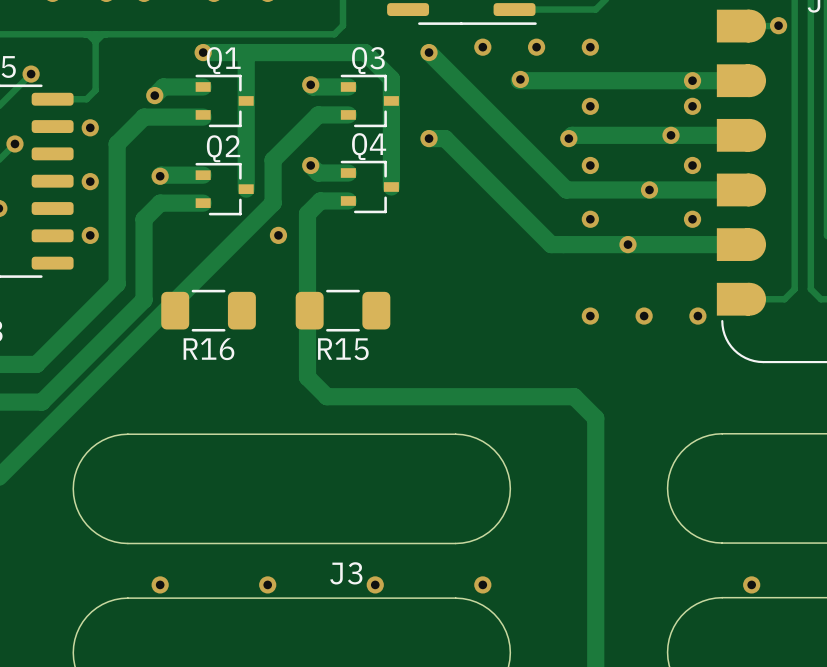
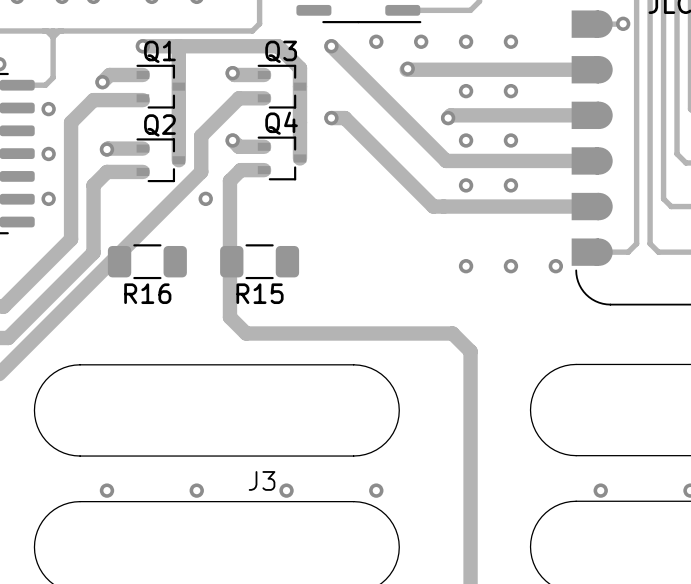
via: none -> (510, 41)
via: (692, 80) -> none
via: none -> (510, 91)
via: (692, 106) -> none
via: (671, 135) -> none
via: none -> (510, 140)
via: (692, 165) -> none
via: (649, 189) -> none
via: none -> (510, 185)
via: (692, 219) -> none
via: (628, 244) -> none

